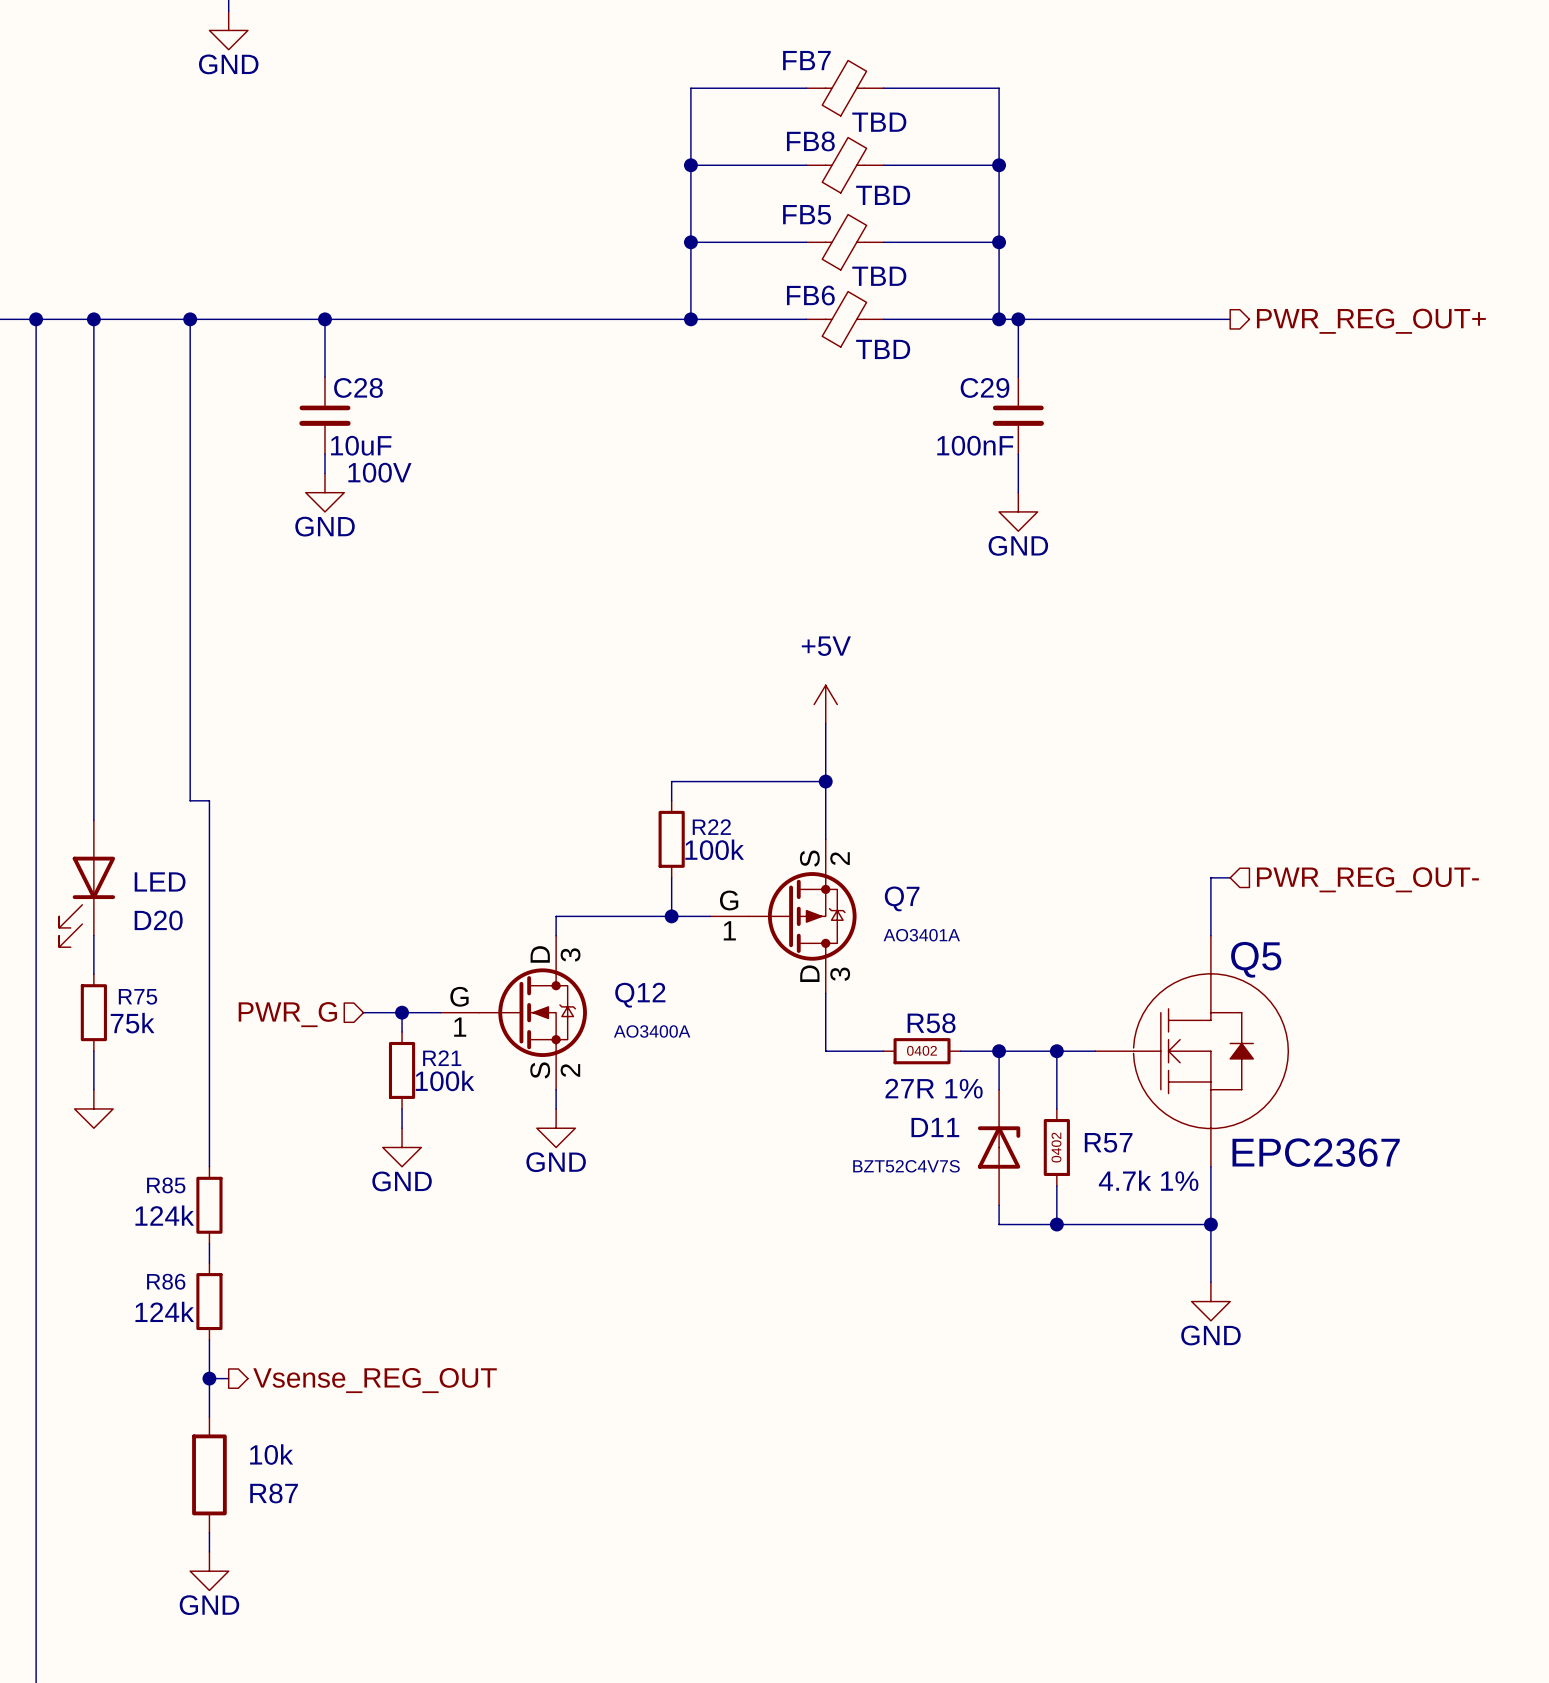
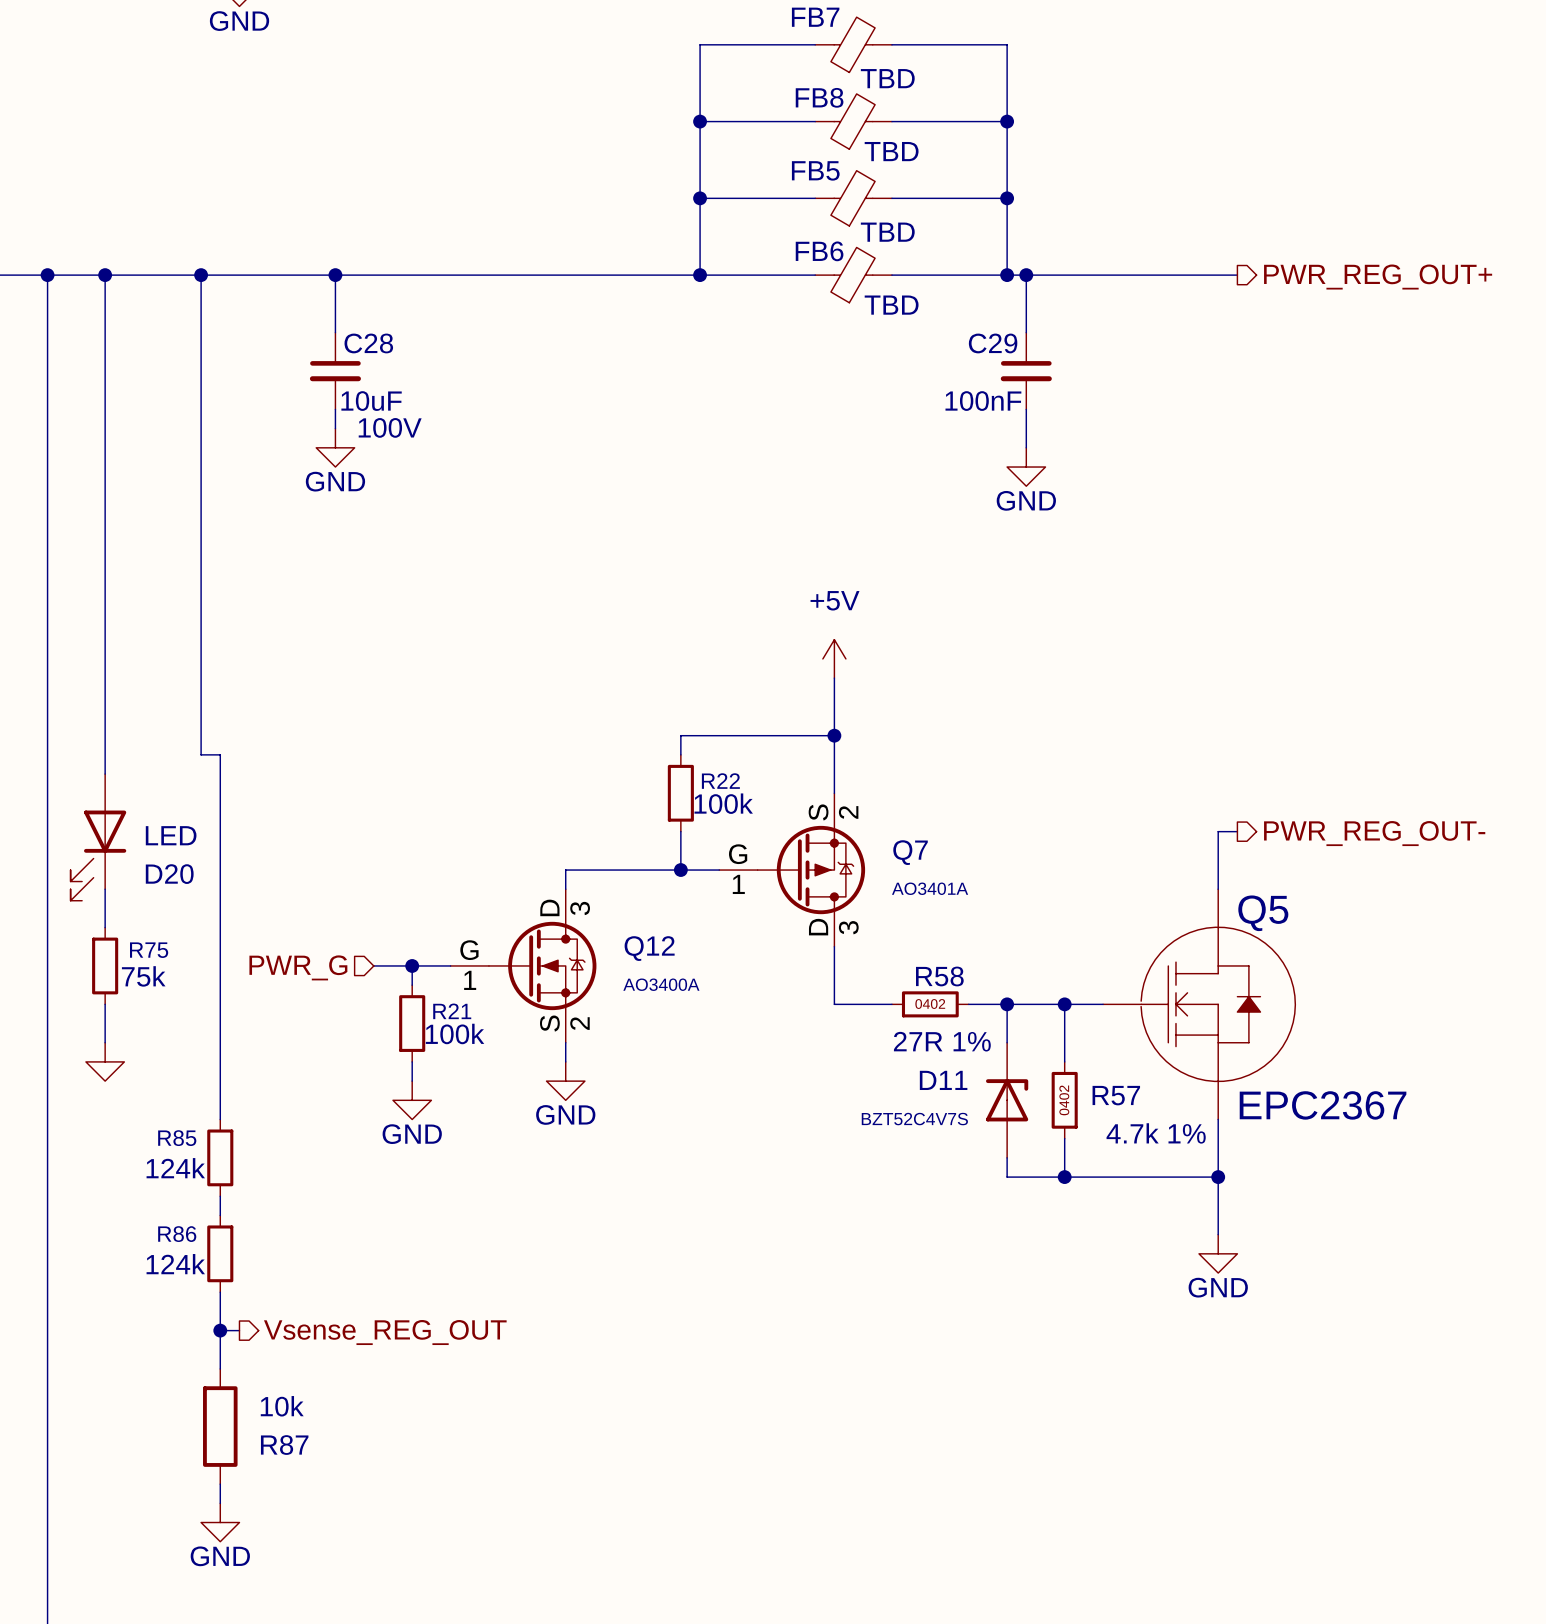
hierarchical label shape: input (1367, 879) -> output (1374, 833)

